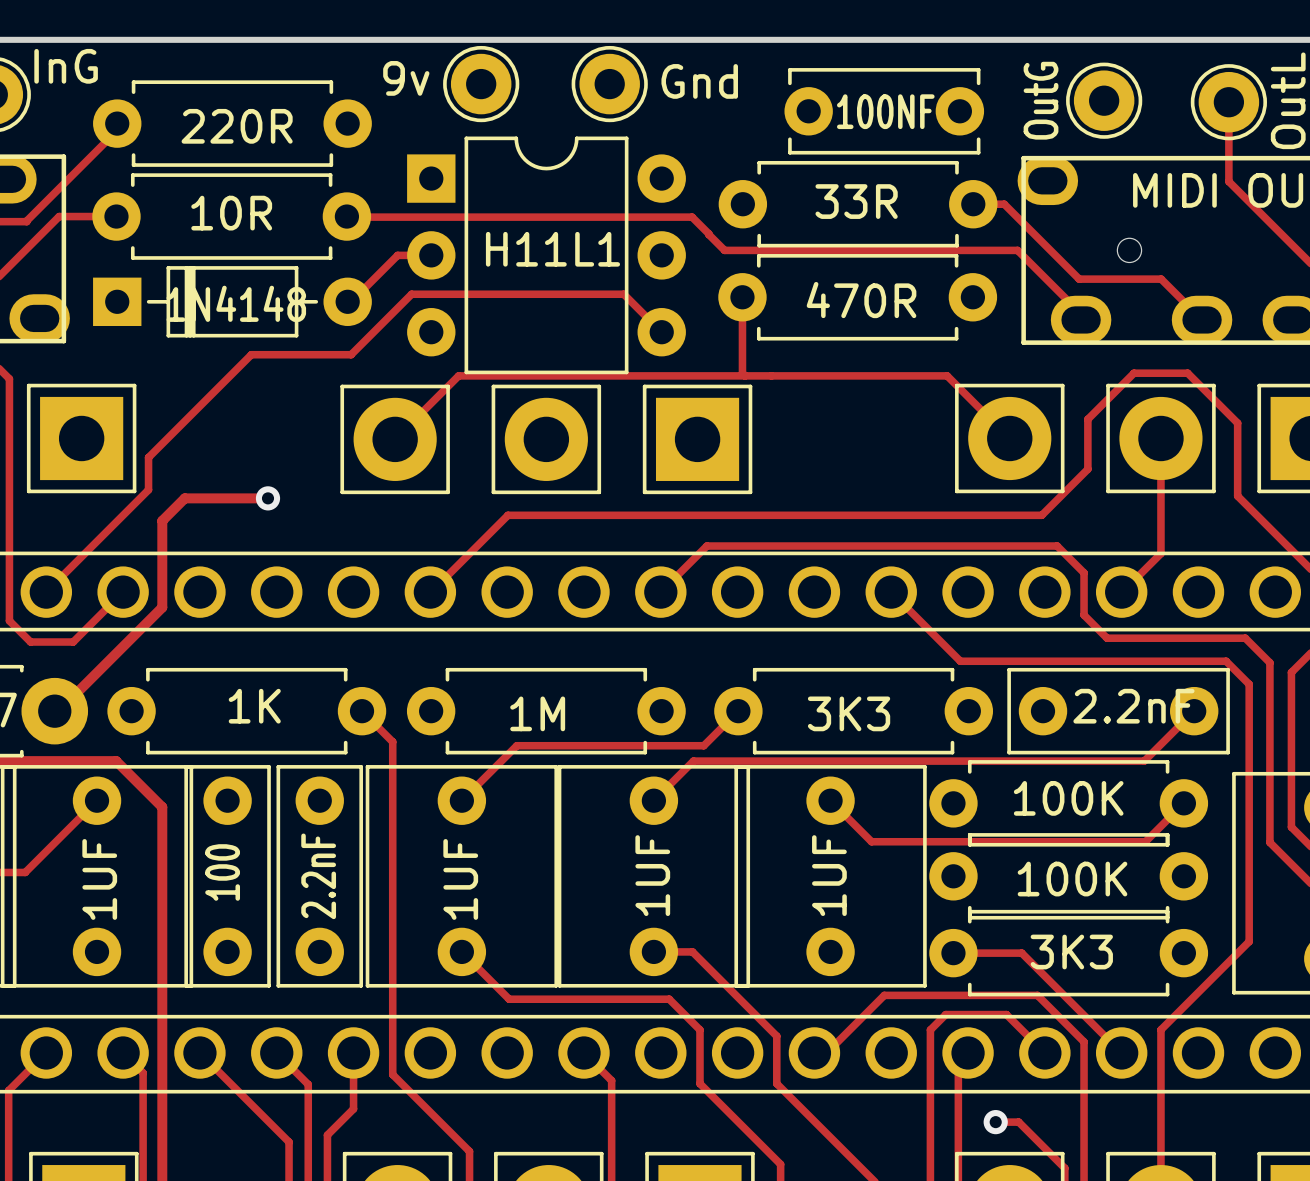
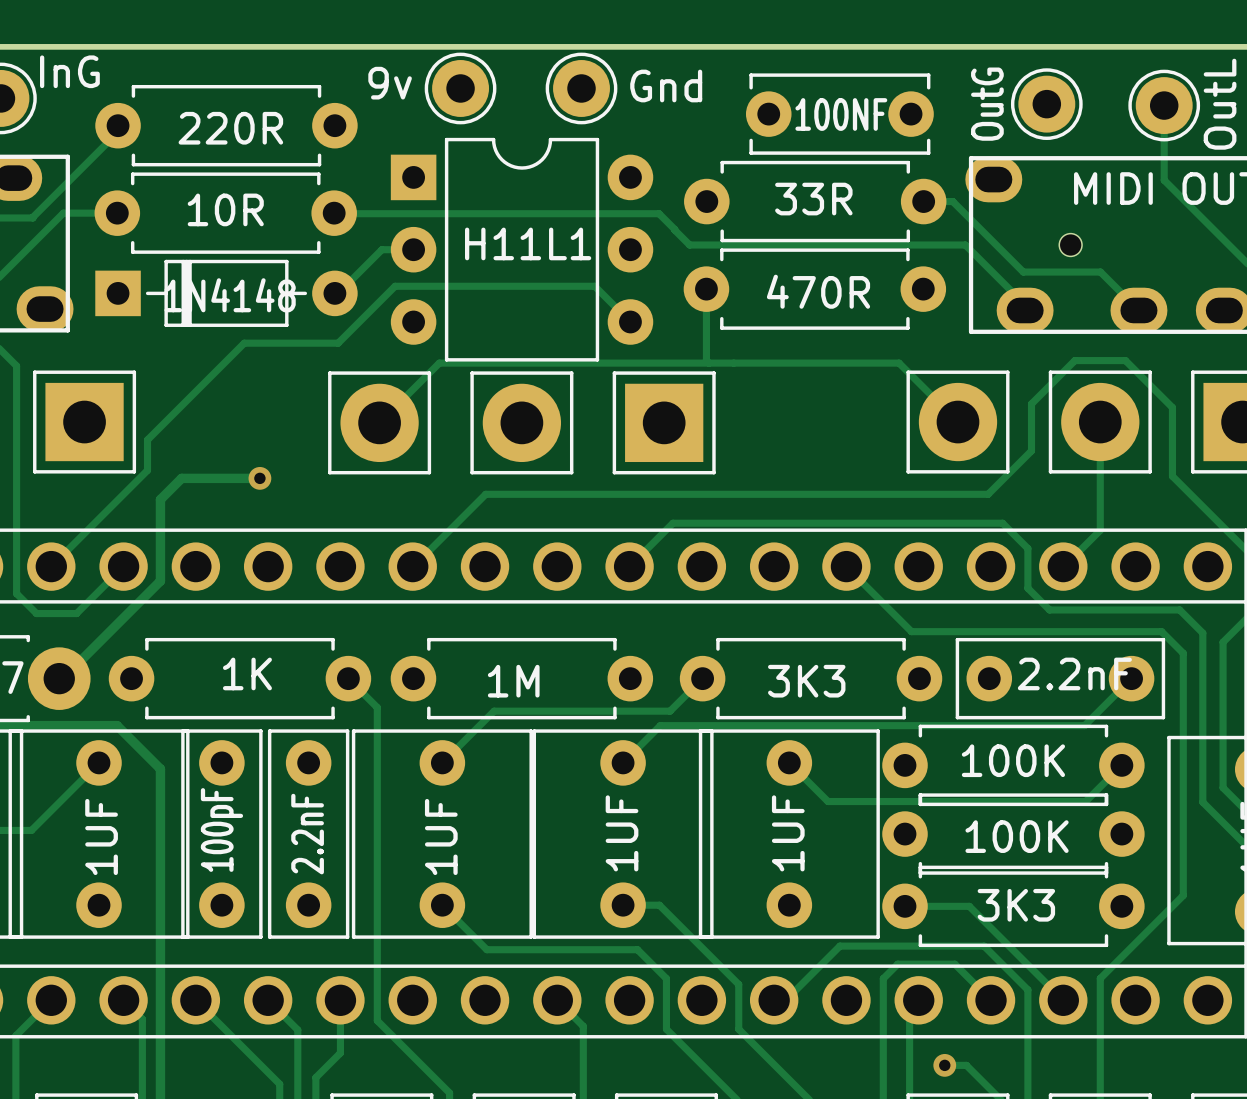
part value: 100 (222, 872) -> 100pF (221, 830)

